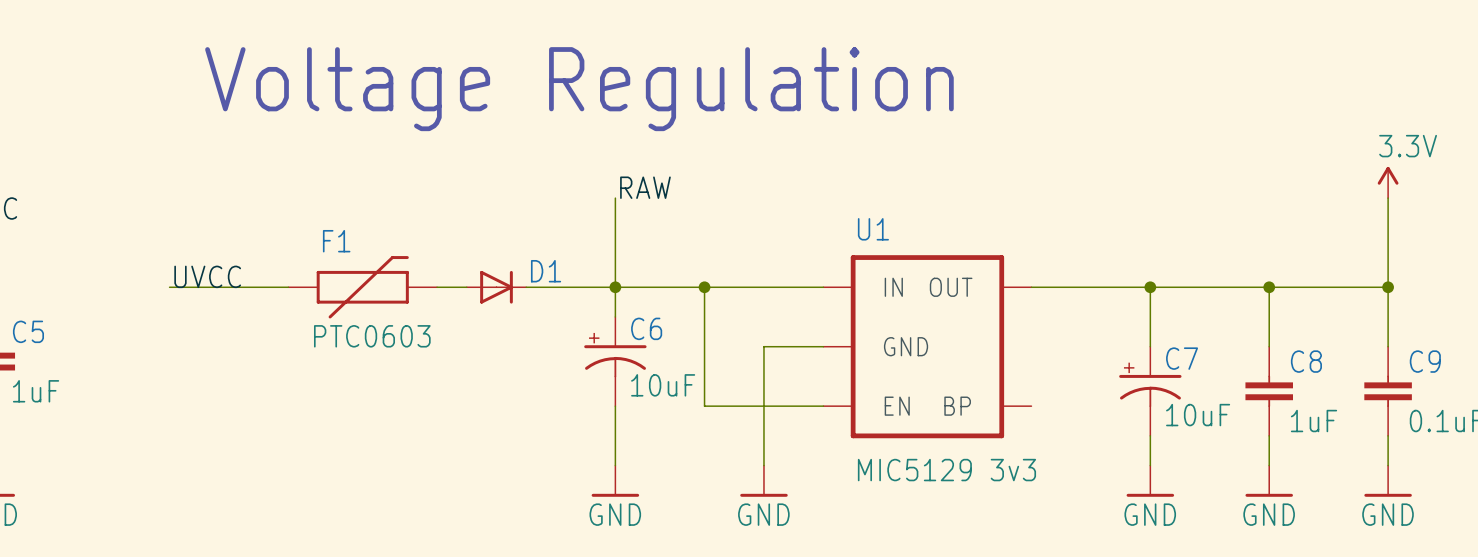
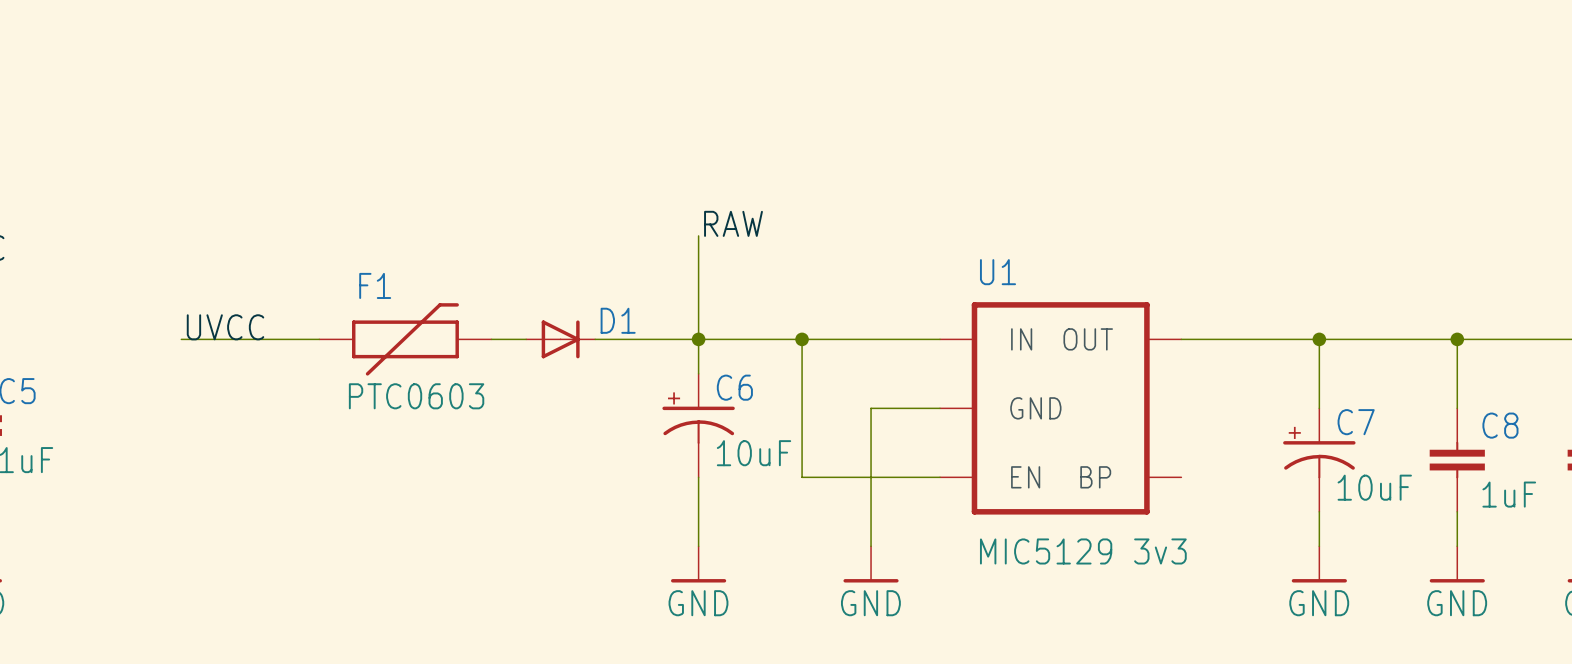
text: Voltage Regulation (579, 89) -> none

